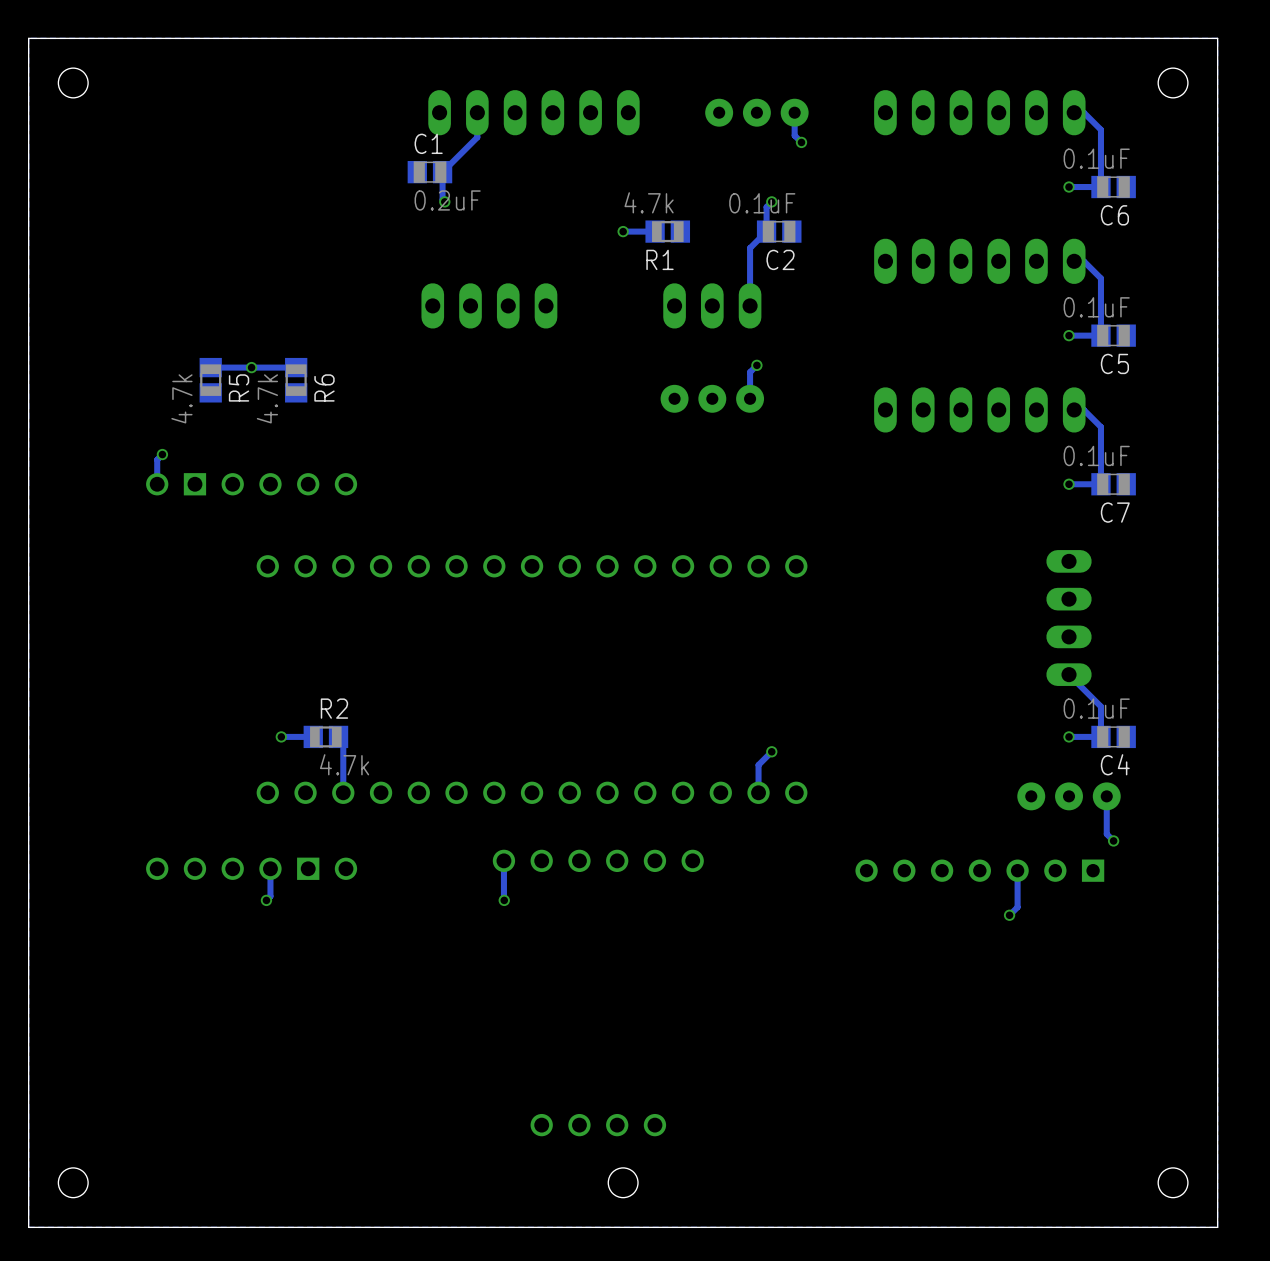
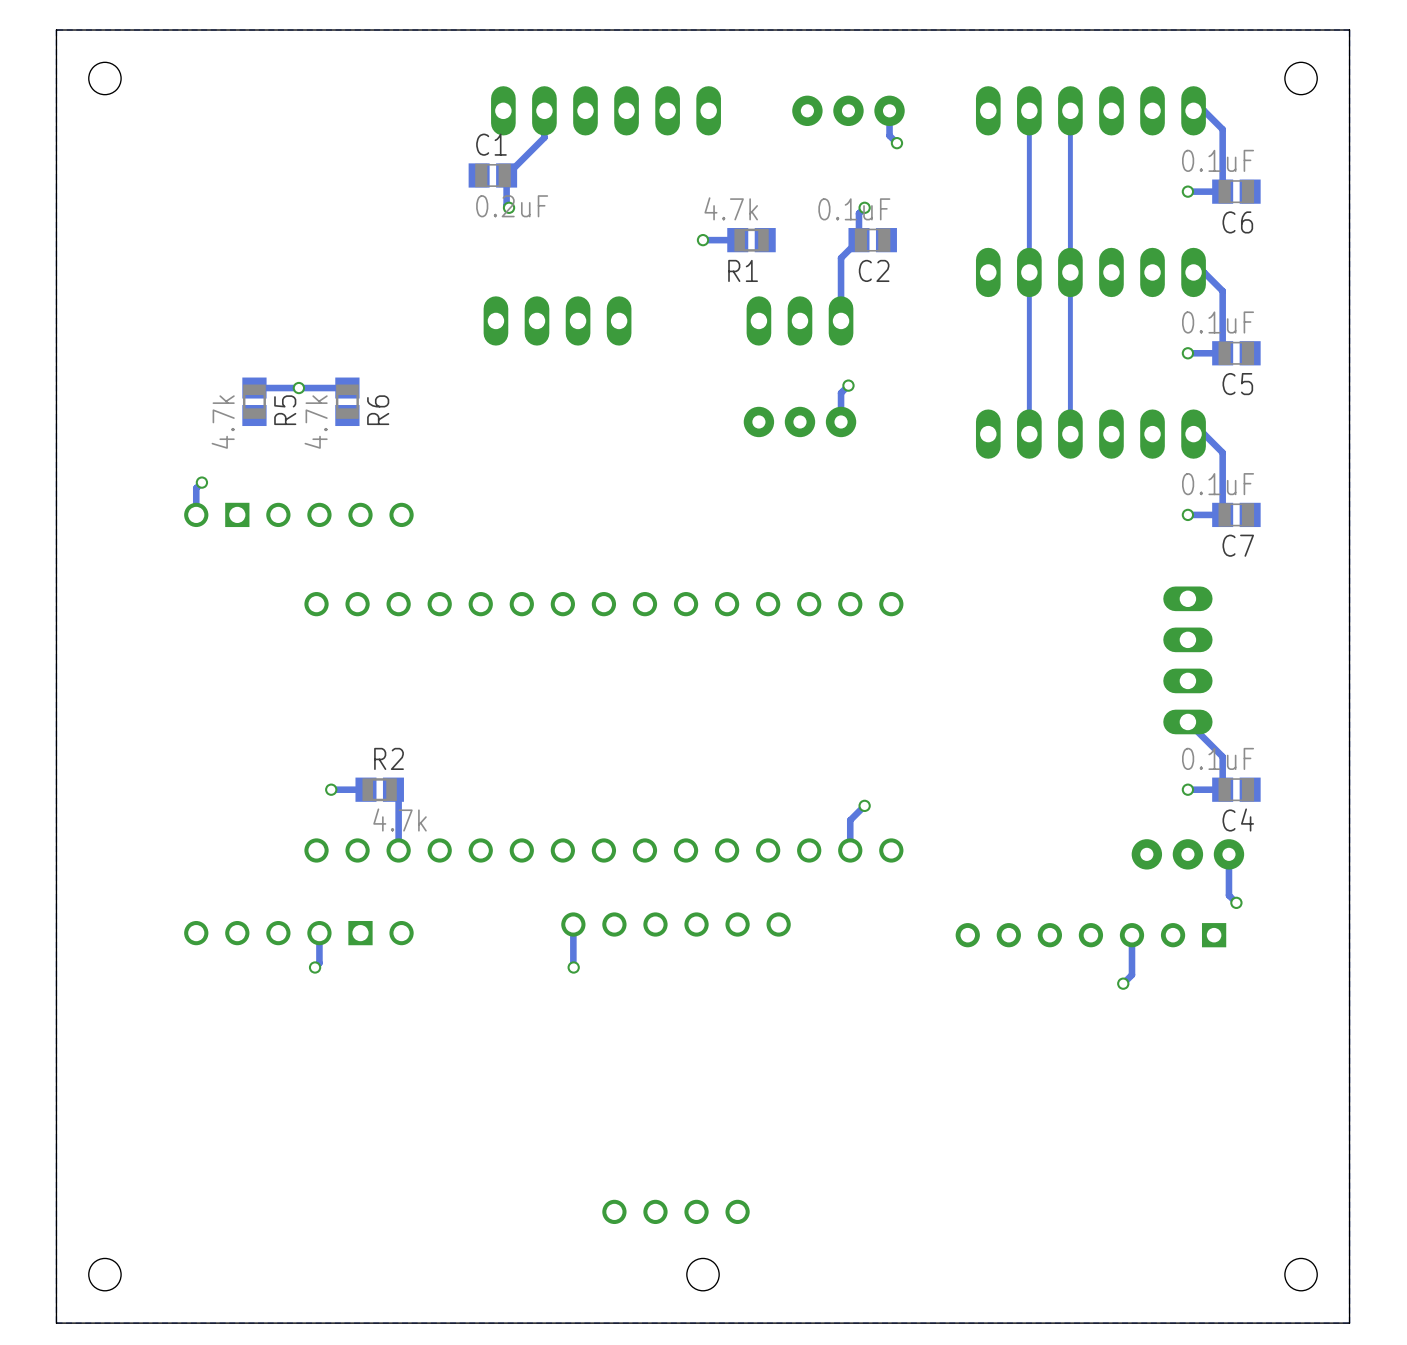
track: none -> (1029, 110) (1029, 434)
track: none -> (1070, 110) (1070, 434)

